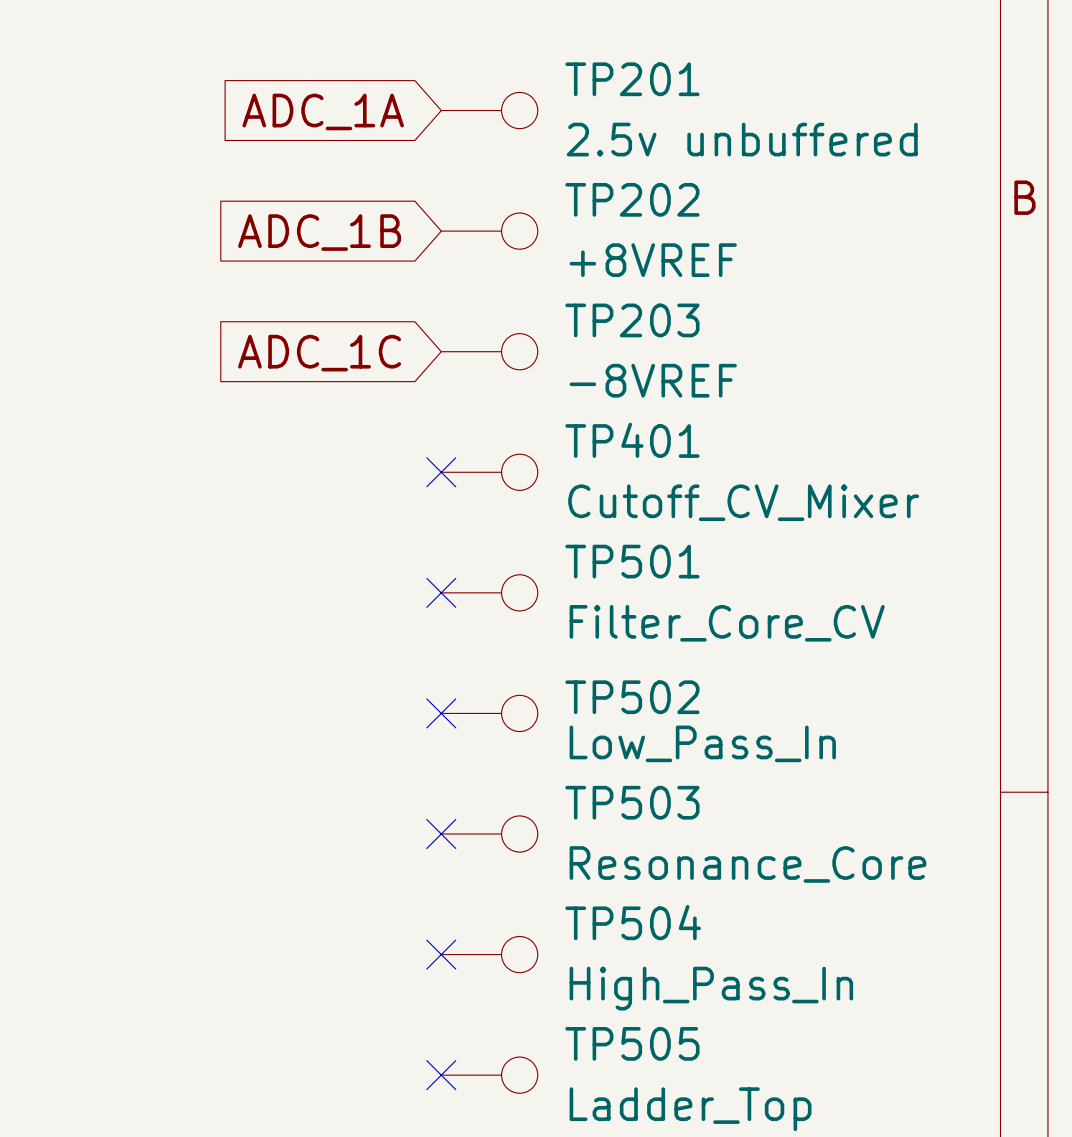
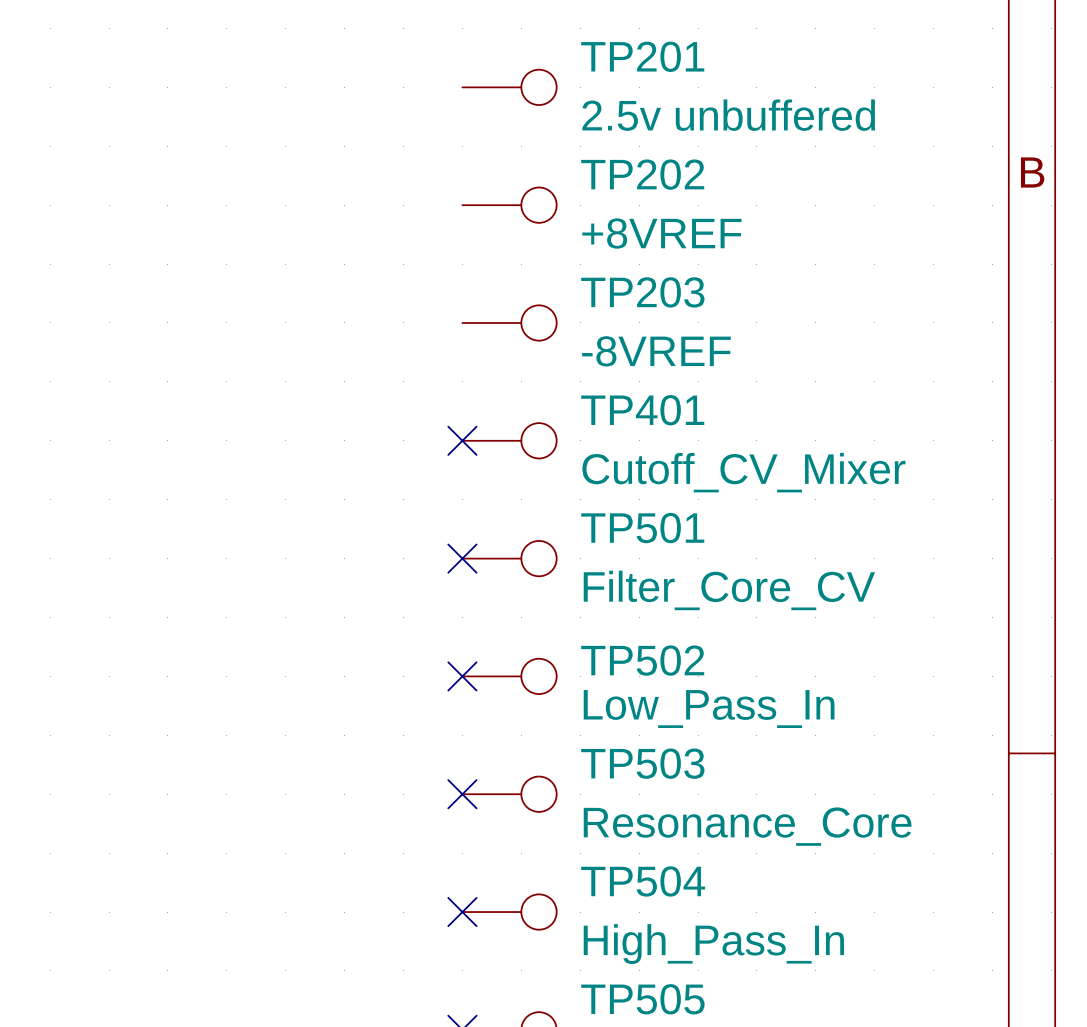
global label: ADC_1A (323, 111) -> none
global label: ADC_1B (319, 232) -> none
global label: ADC_1C (319, 353) -> none

